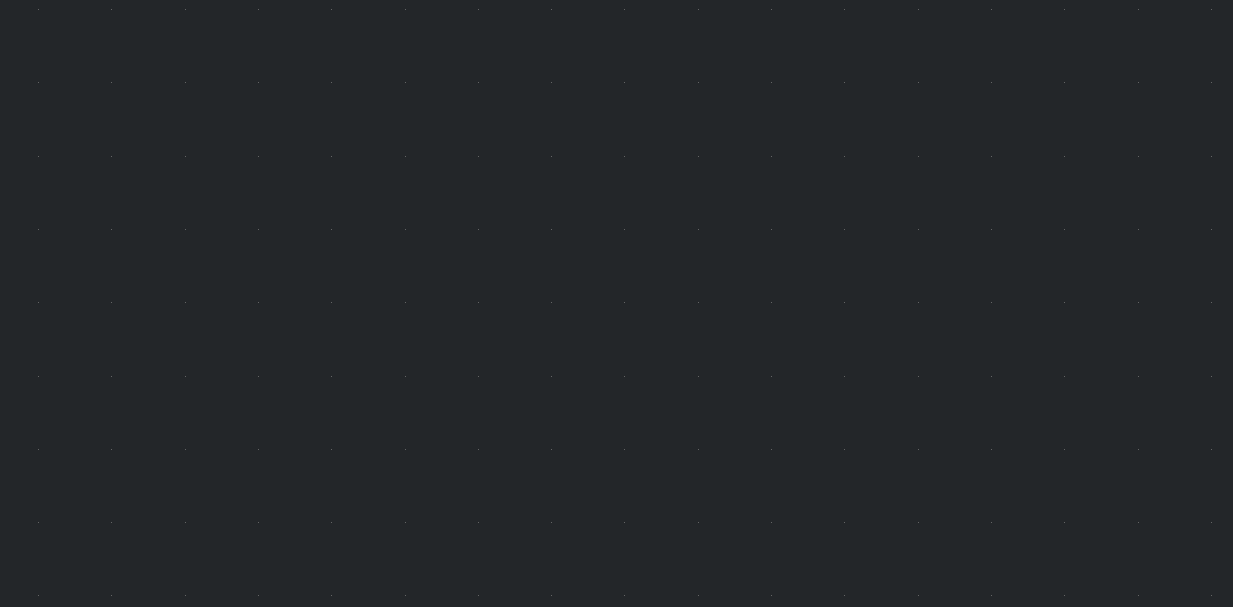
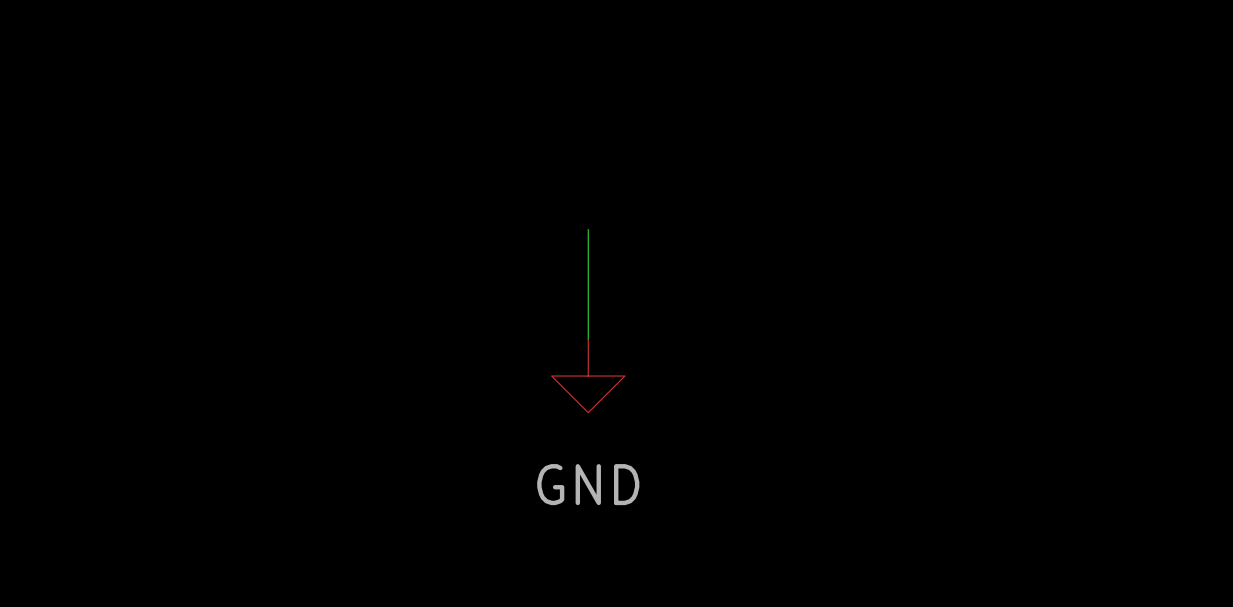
wire: none -> (588, 229) (588, 339)
power symbol: none -> GND (588, 376)

